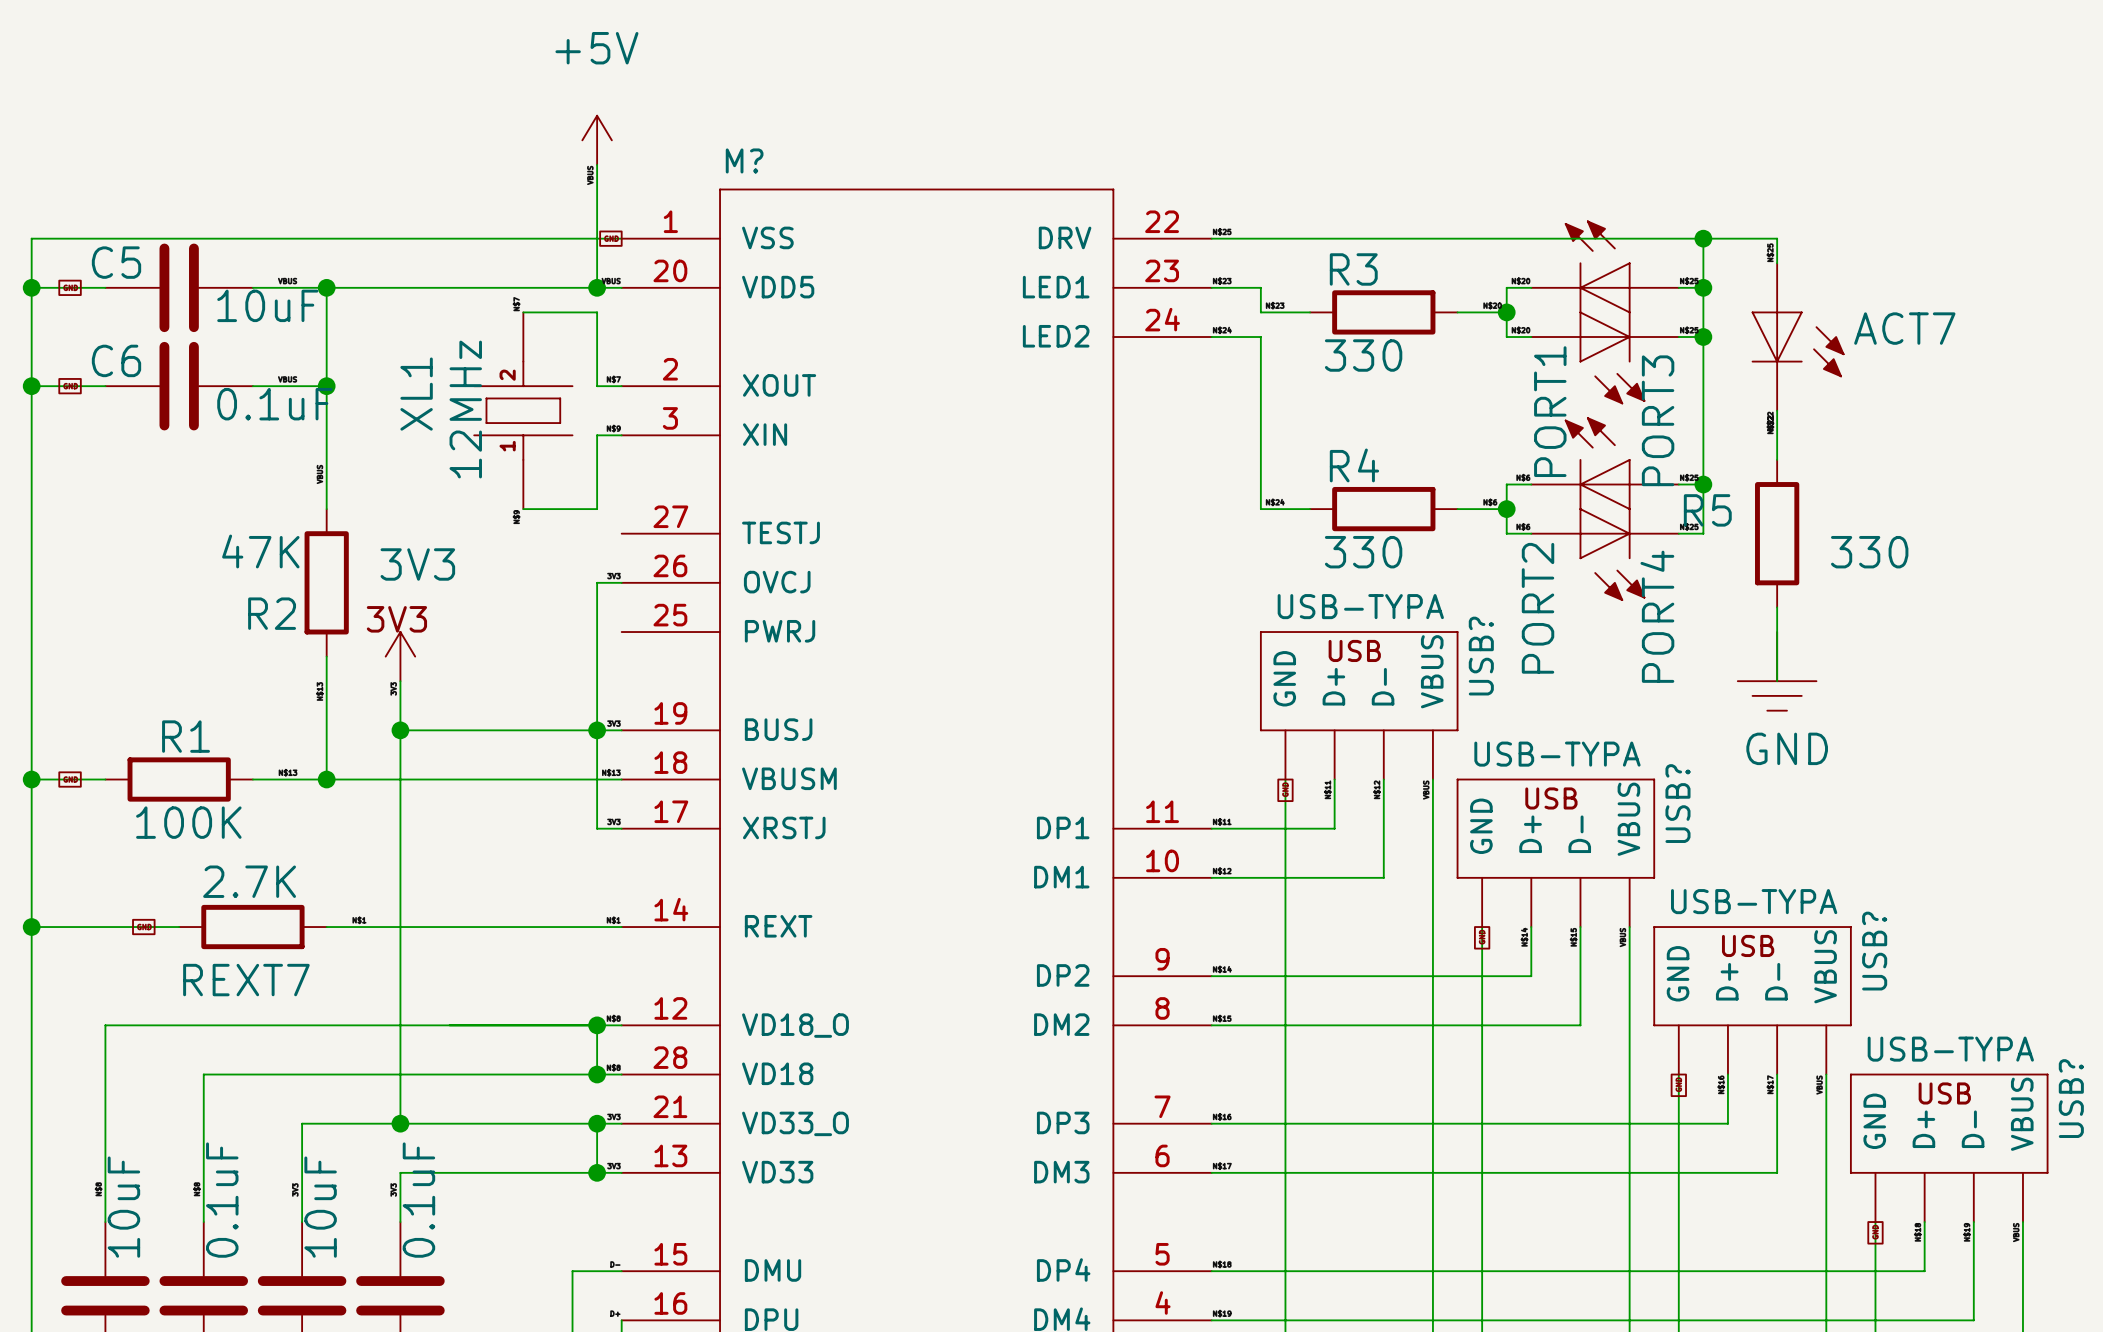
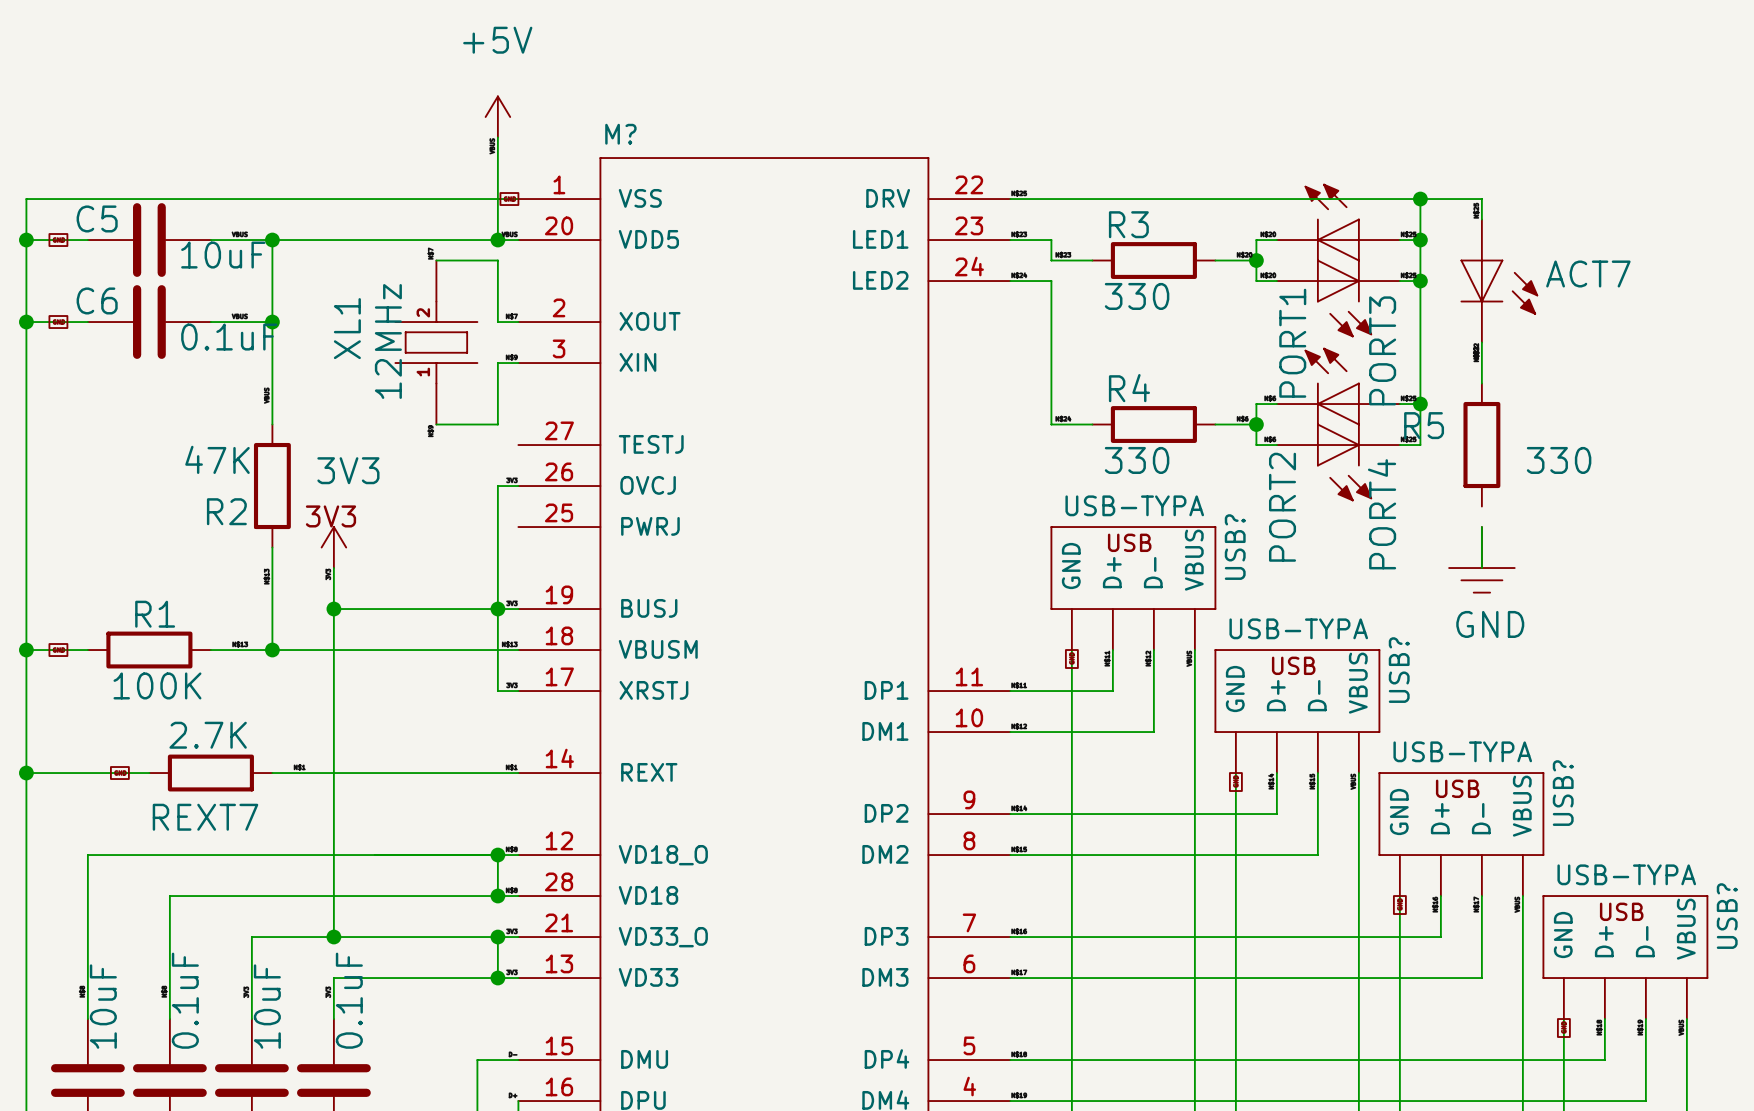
wire: (1777, 607) (1777, 632) -> none

